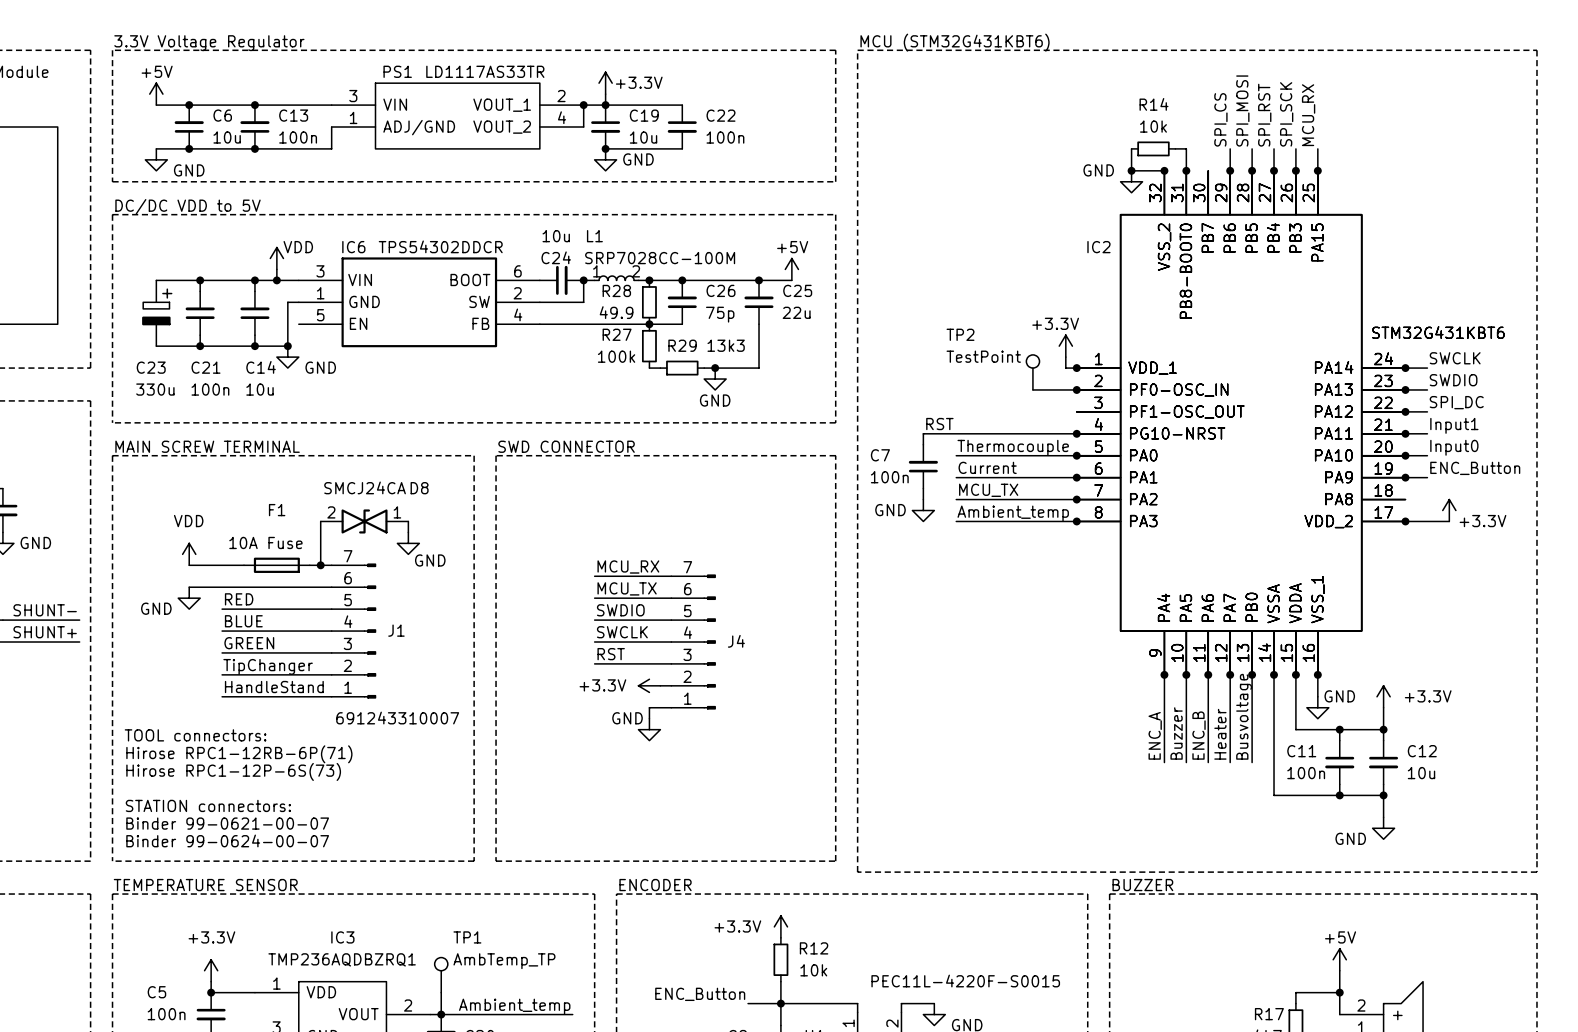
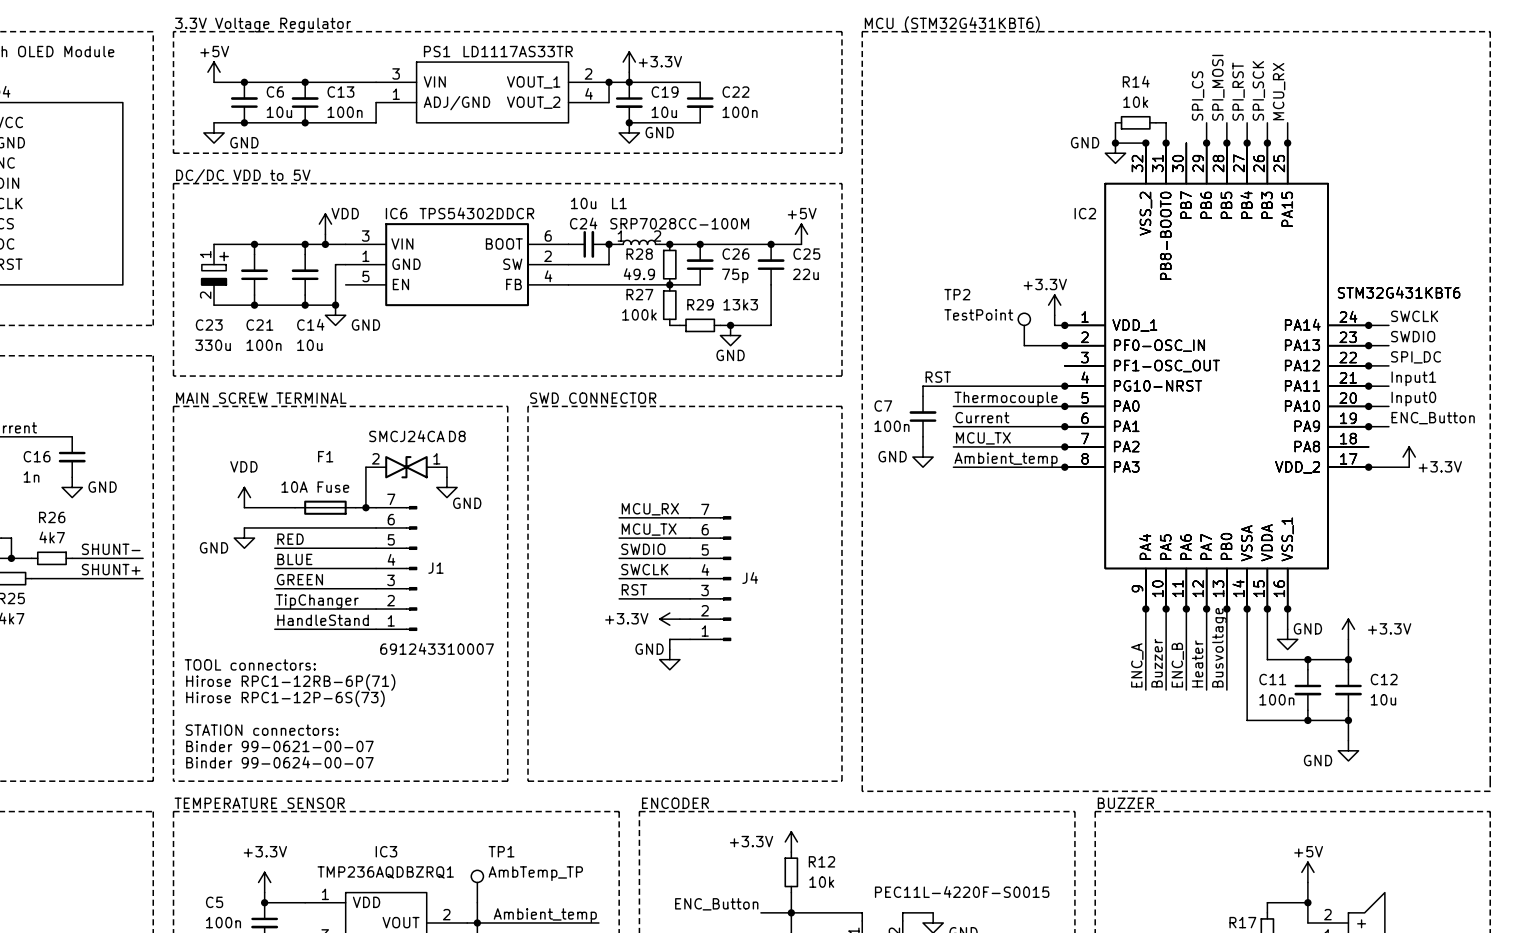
C23 pin number: none -> 1 (205, 254)
C23 pin number: none -> 2 (205, 295)

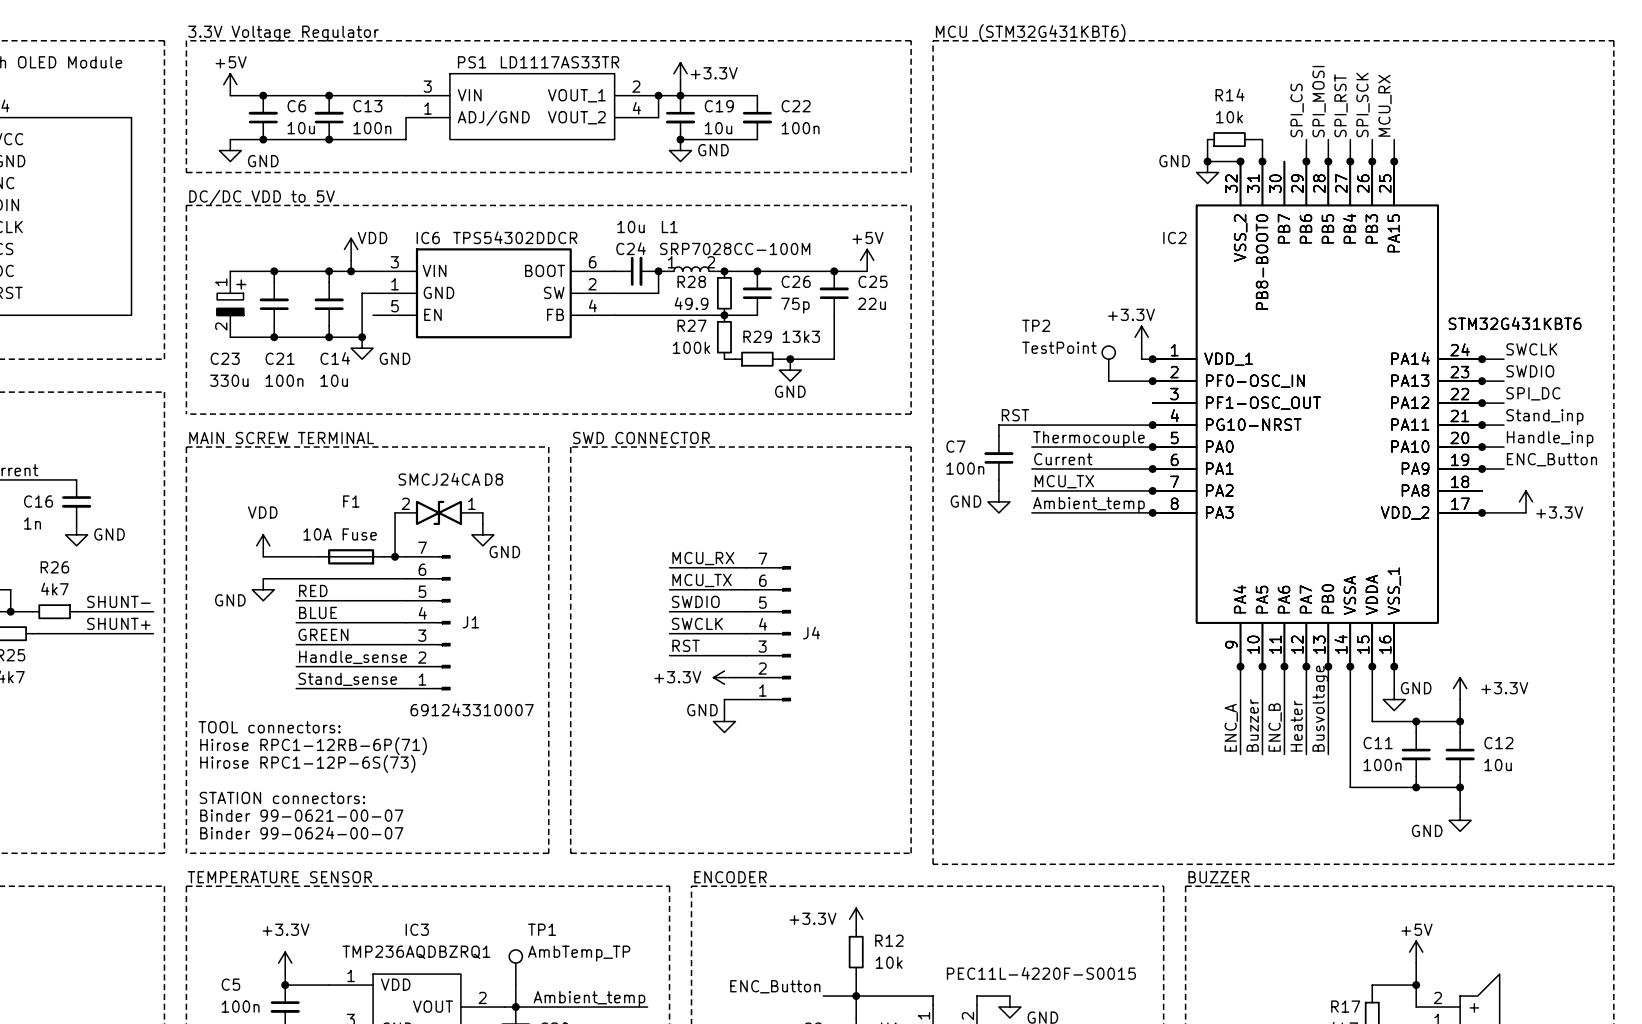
label: Input1 (1413, 378) -> Stand_inp (1544, 417)
label: Input0 (1413, 399) -> Handle_inp (1550, 439)
label: TipChanger (317, 601) -> Handle_sense (353, 657)
label: HandleStand (323, 620) -> Stand_sense (347, 679)

